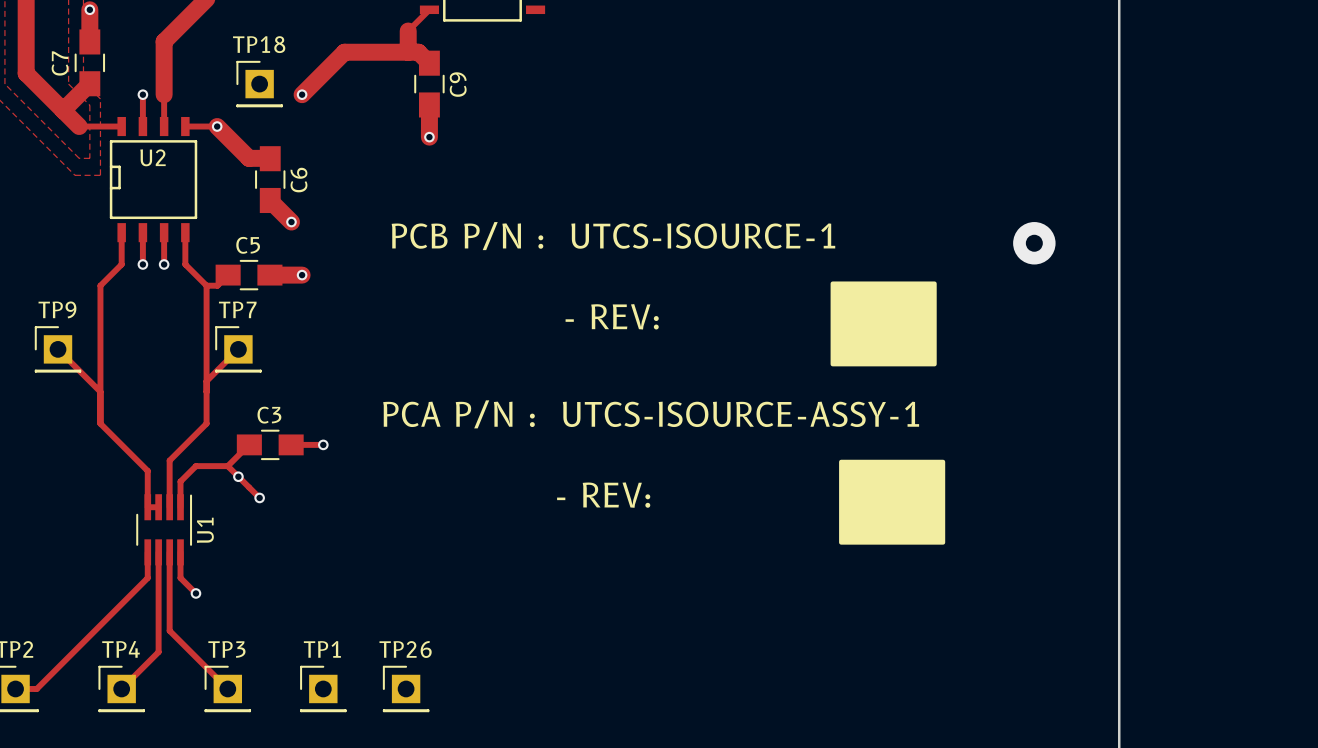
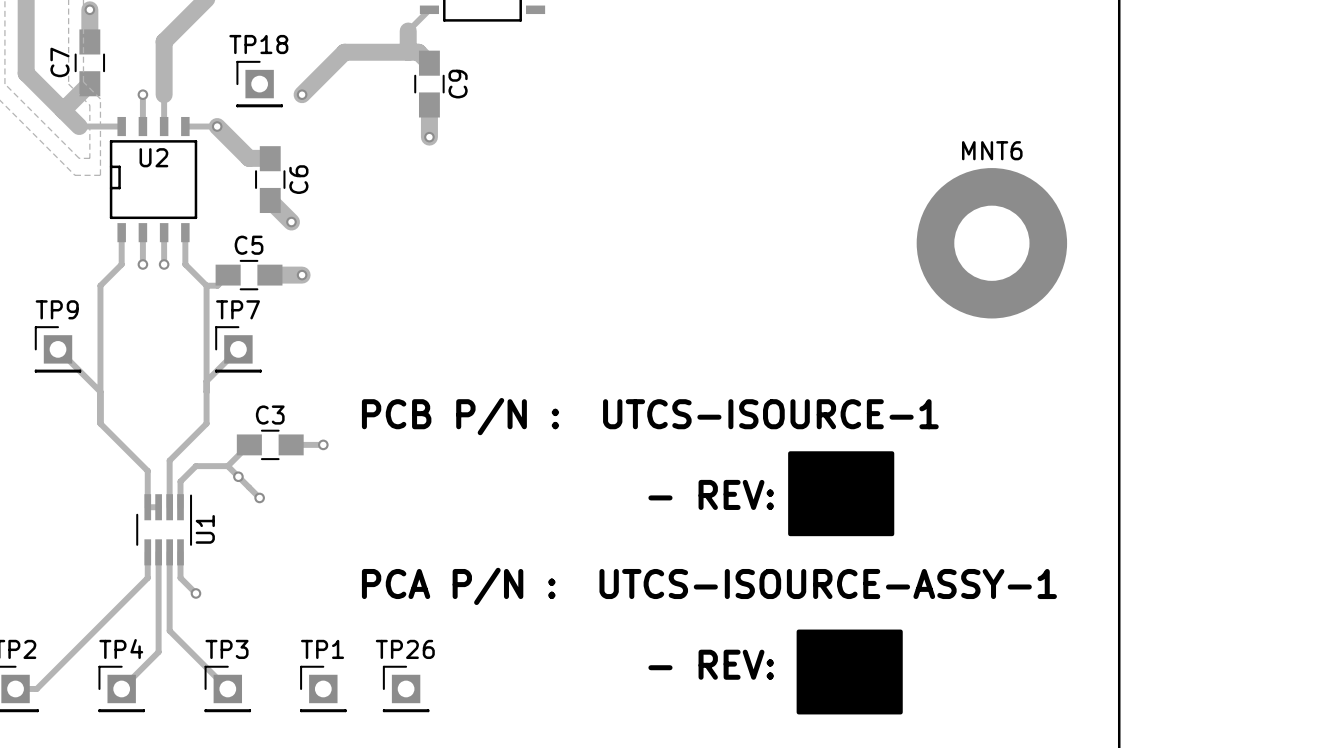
text position: PCB P/N : UTCS-ISOURCE-1 (613, 236) -> PCB P/N : UTCS-ISOURCE-1 (650, 416)
MNT6: none -> (991, 243)
via: (1034, 243) -> none
drawing: [830, 281, 937, 367] -> none
text: - REV: (612, 316) -> none
text position: PCA P/N : UTCS-ISOURCE-ASSY-1 (651, 414) -> PCA P/N : UTCS-ISOURCE-ASSY-1 (709, 586)
text position: - REV: (603, 495) -> - REV: (711, 494)
drawing position: (892, 502) -> (841, 493)
drawing: none -> [796, 629, 903, 715]
text: none -> - REV: (711, 664)

